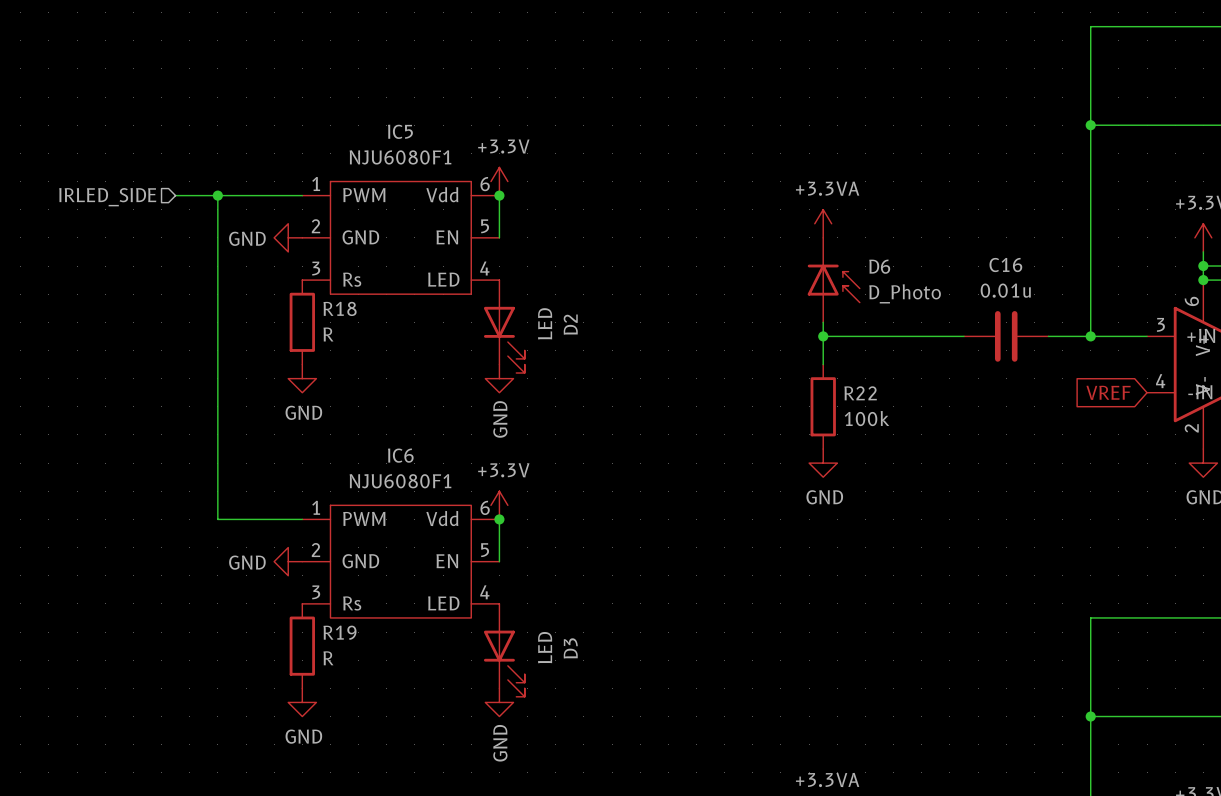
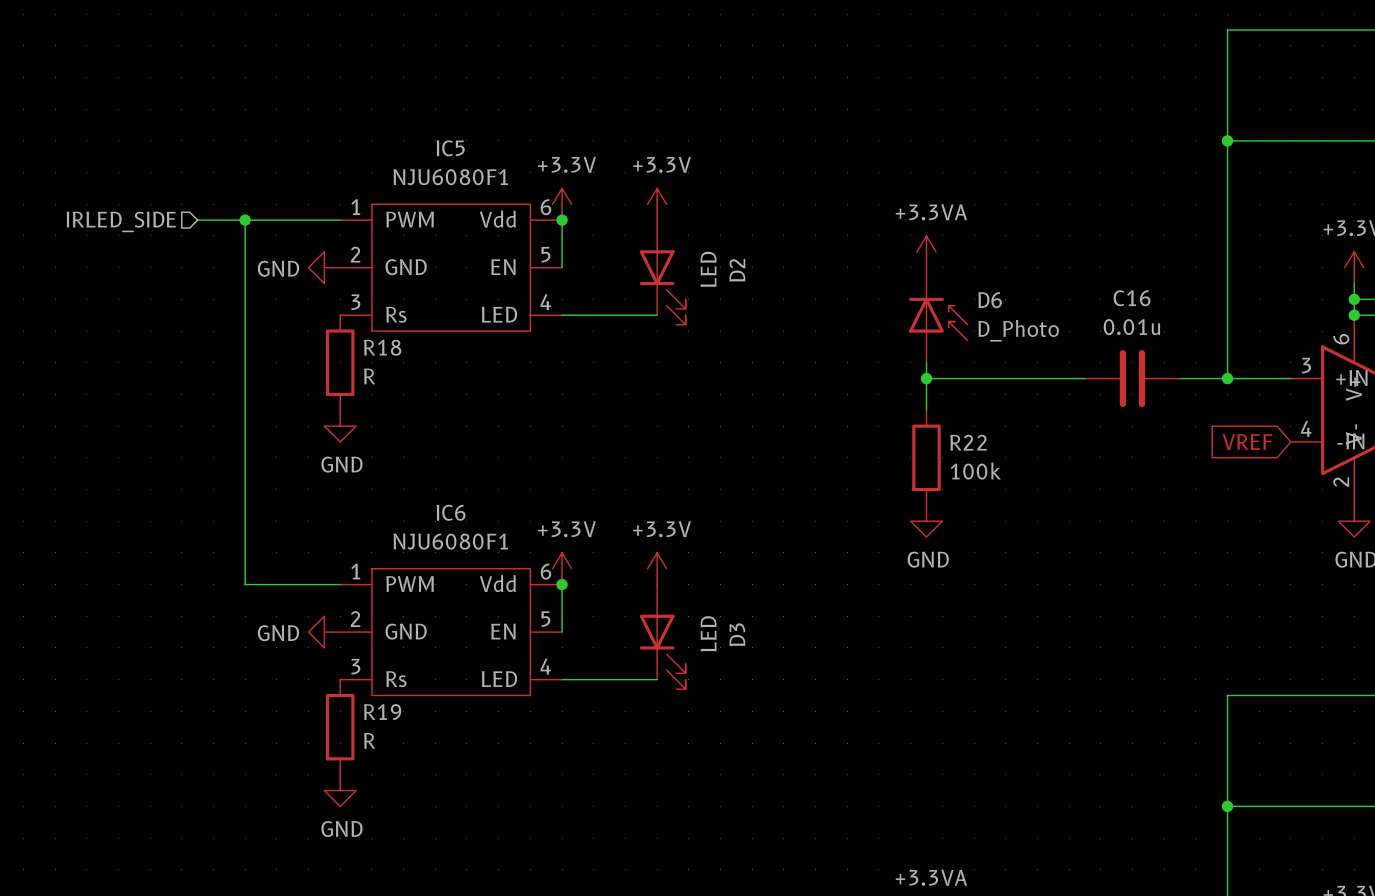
power symbol: none -> +3.3V (657, 204)
wire: none -> (562, 315) (657, 315)
D2 position: (504, 326) -> (662, 272)
power symbol: GND (499, 378) -> none
power symbol: none -> +3.3V (657, 568)
wire: none -> (562, 679) (657, 679)
D3 position: (504, 650) -> (662, 636)
power symbol: GND (499, 702) -> none

